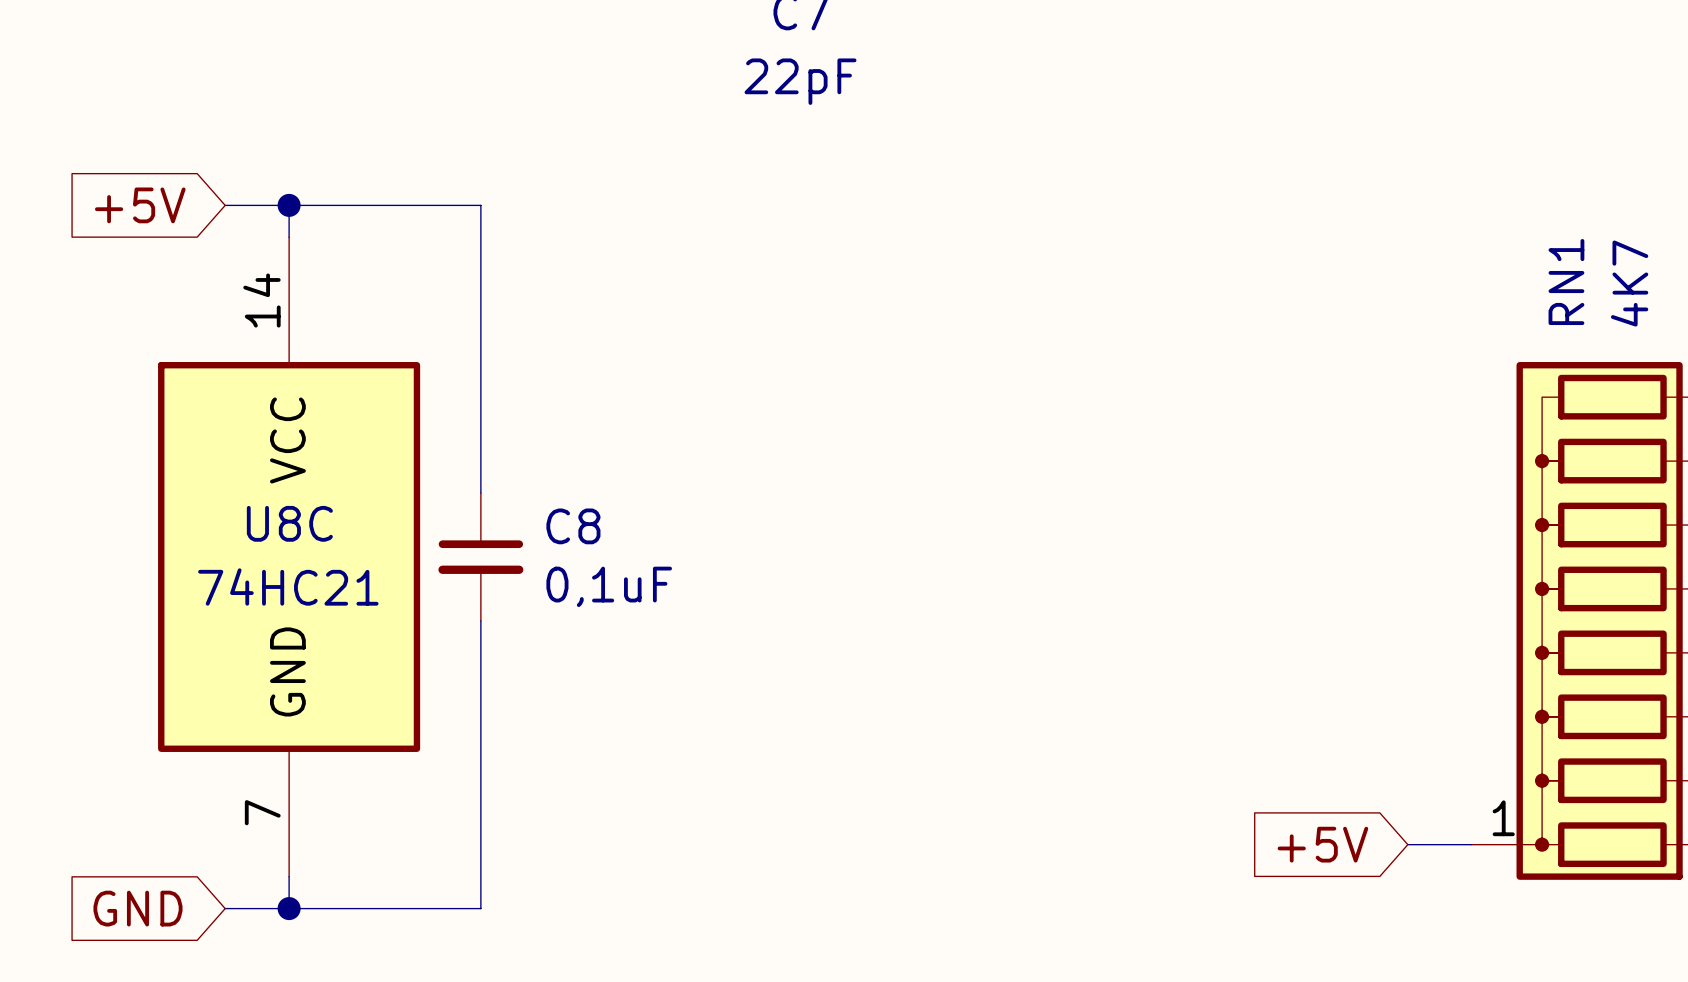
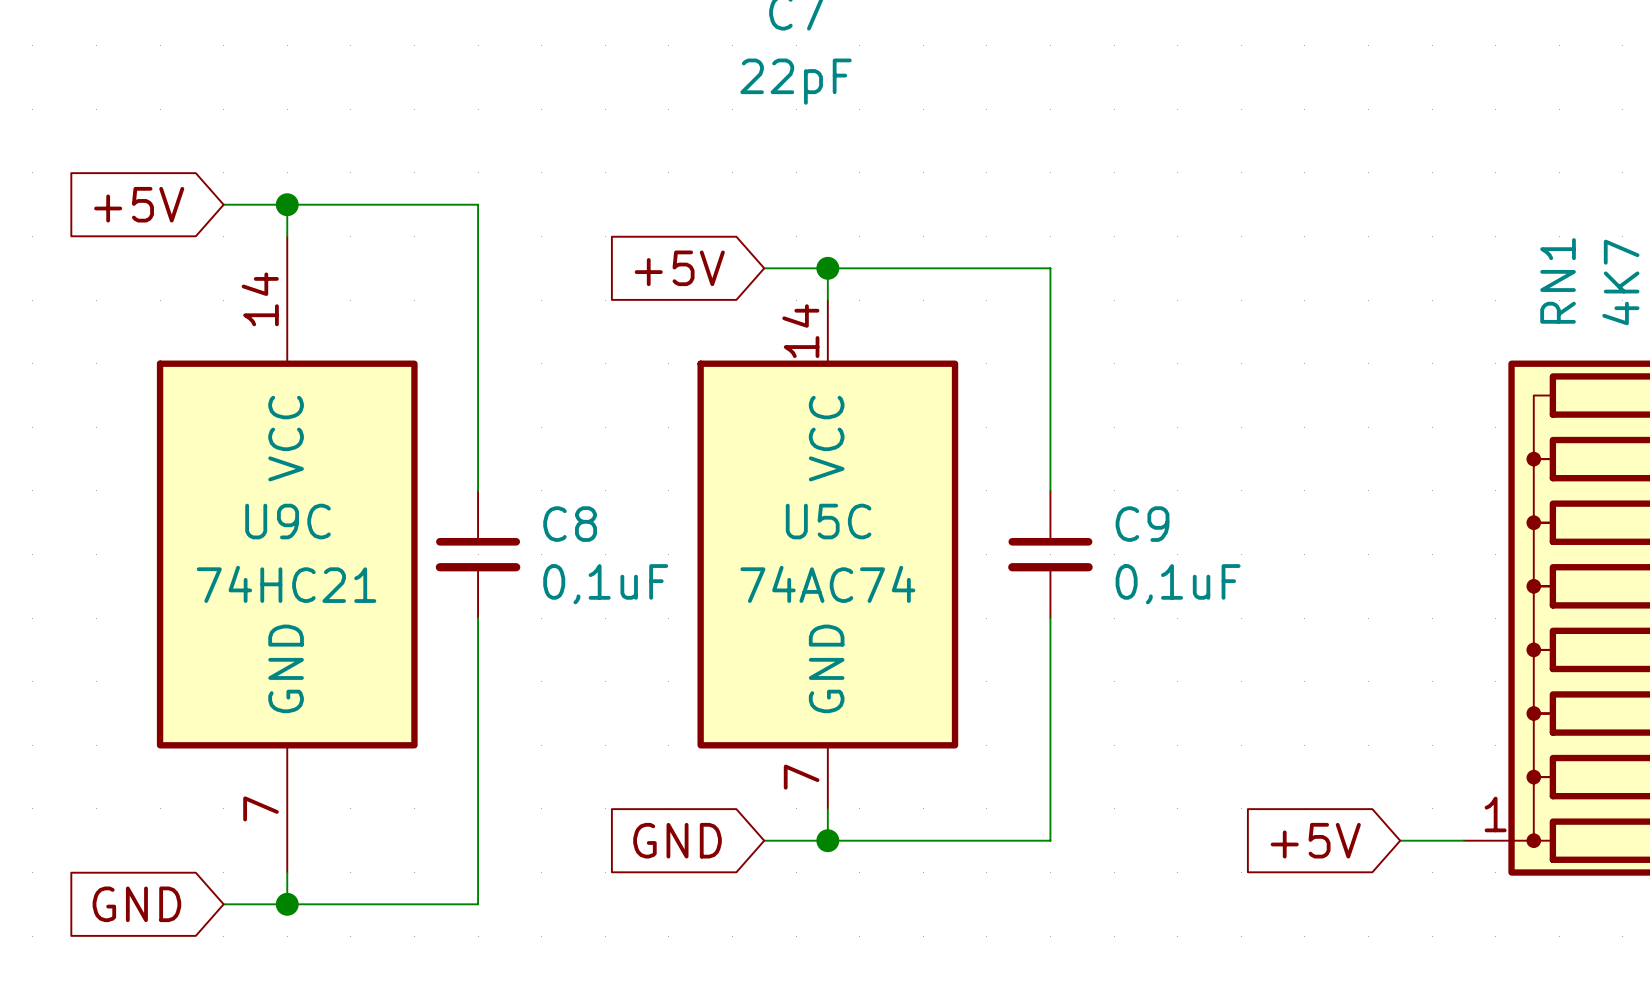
global label: none -> +5V (679, 268)
wire: none -> (764, 268) (1050, 268) (1050, 490)
wire: none -> (827, 268) (827, 300)
junction: none -> (827, 268)
U8C name: U8C (289, 523) -> U9C (288, 521)
U5C: none -> 74AC74 (827, 554)
C9: none -> 0,1uF (1050, 554)
wire: none -> (1050, 618) (1050, 840) (764, 840)
wire: none -> (827, 808) (827, 840)
global label: none -> GND (677, 840)
junction: none -> (827, 840)

